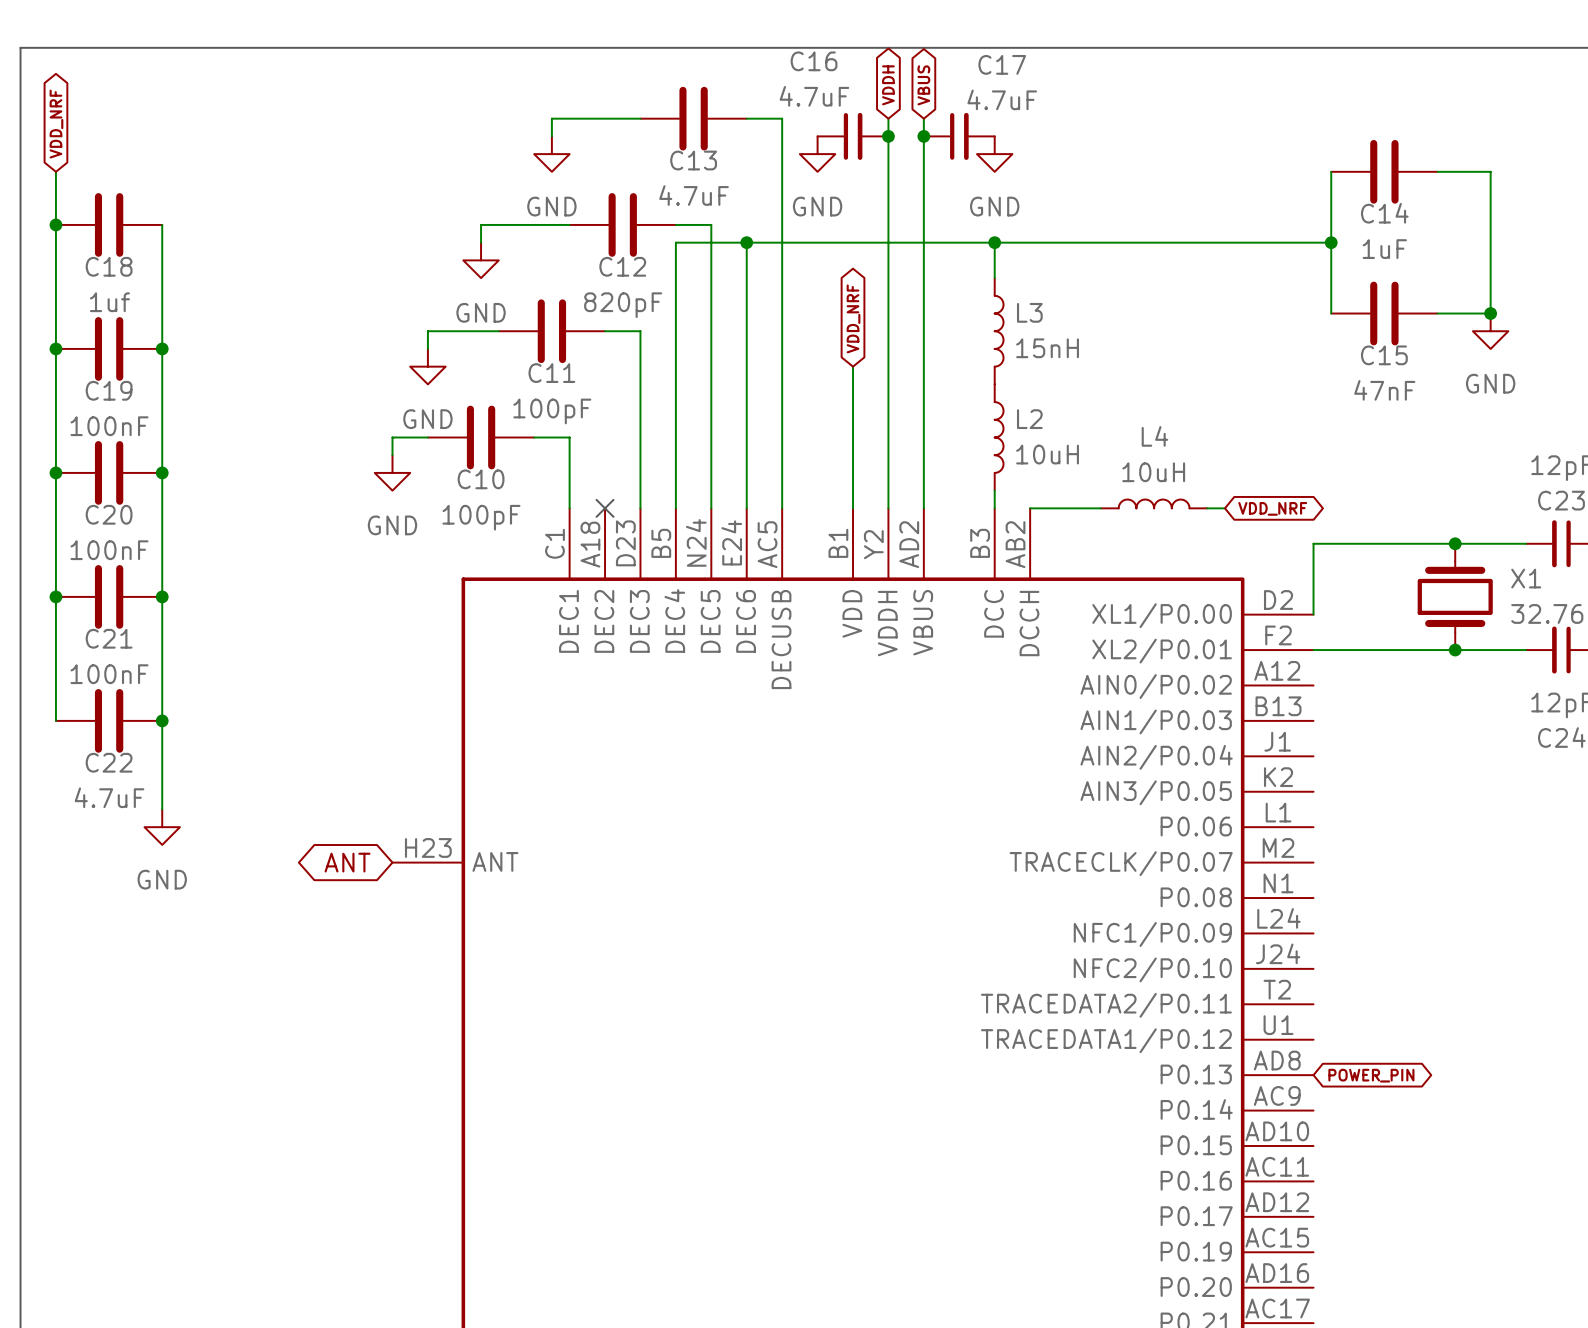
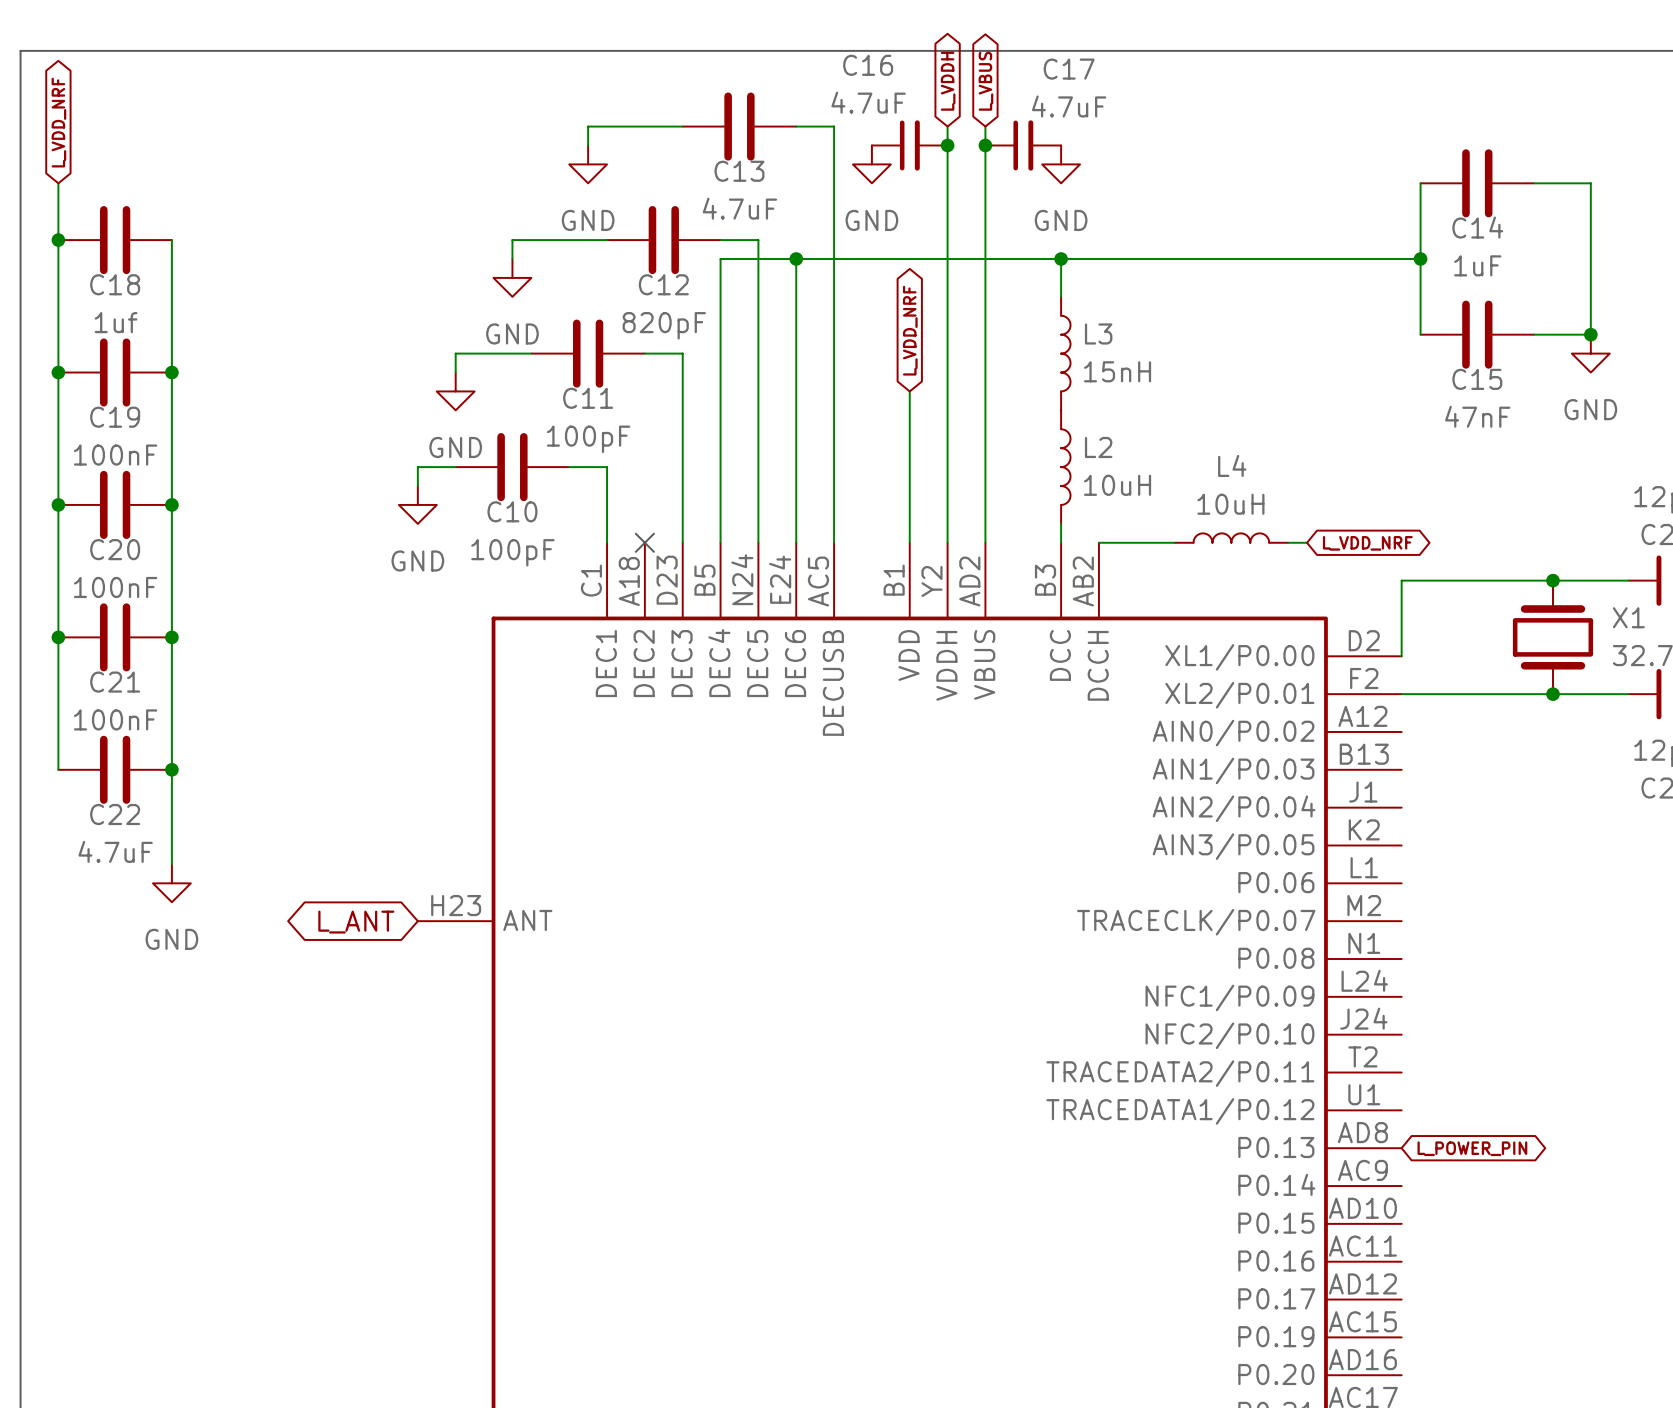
global label: VDDH (888, 85) -> L_VDDH (948, 81)
global label: VBUS (923, 85) -> L_VBUS (985, 81)
global label: VDD_NRF (56, 124) -> L_VDD_NRF (58, 122)
global label: VDD_NRF (853, 318) -> L_VDD_NRF (910, 330)
global label: VDD_NRF (1272, 508) -> L_VDD_NRF (1367, 543)
global label: ANT (347, 862) -> L_ANT (356, 922)
global label: POWER_PIN (1371, 1075) -> L_POWER_PIN (1472, 1148)

